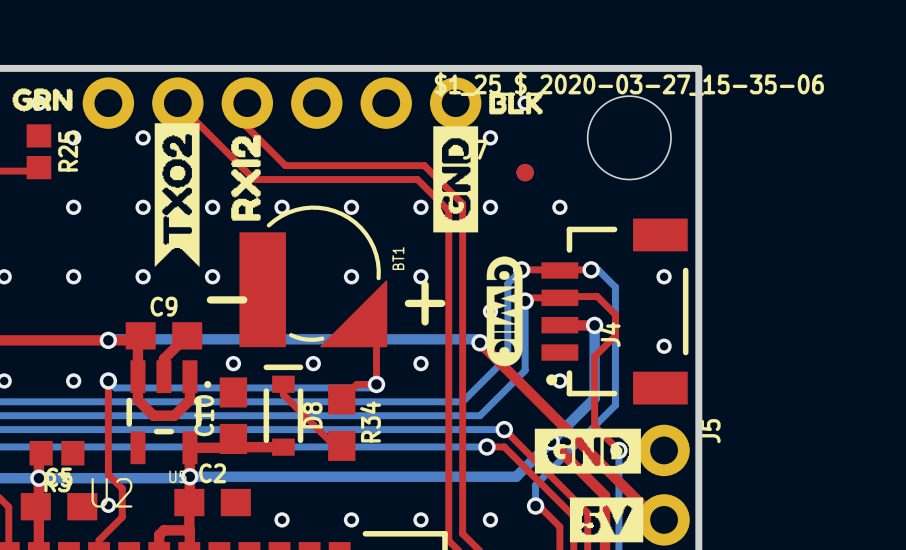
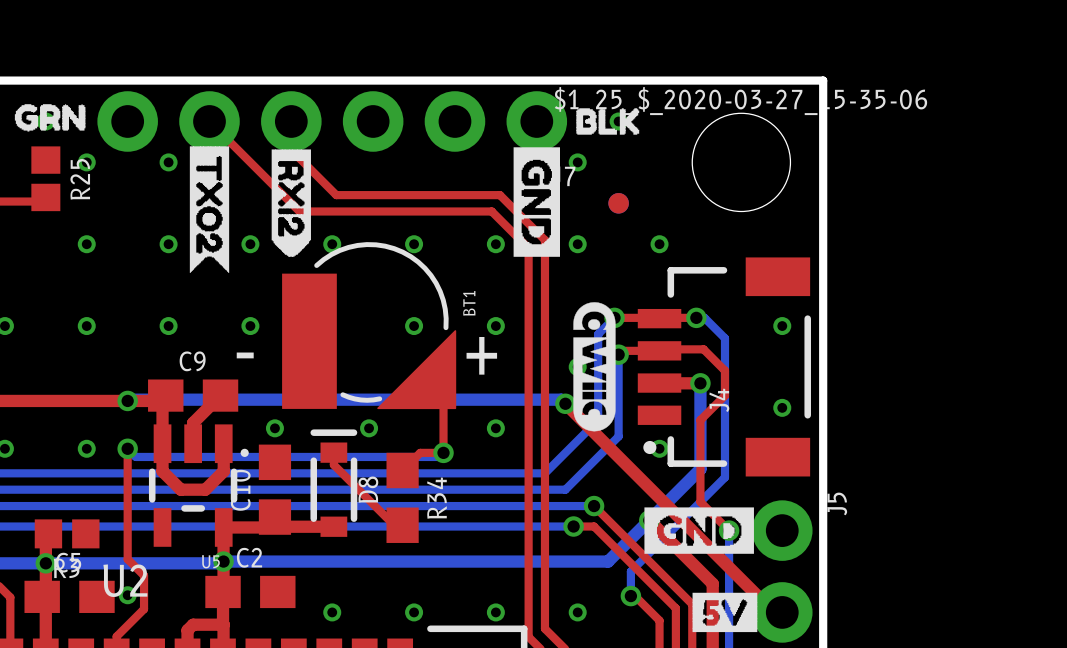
drawing shape: [154, 123, 200, 267] -> [189, 146, 230, 273]
drawing shape: [433, 126, 479, 233] -> [513, 147, 560, 257]
drawing shape: [231, 135, 261, 221] -> [271, 149, 311, 257]
drawing shape: [534, 428, 641, 474] -> [644, 507, 754, 554]
drawing shape: [569, 497, 644, 543] -> [692, 592, 758, 633]

